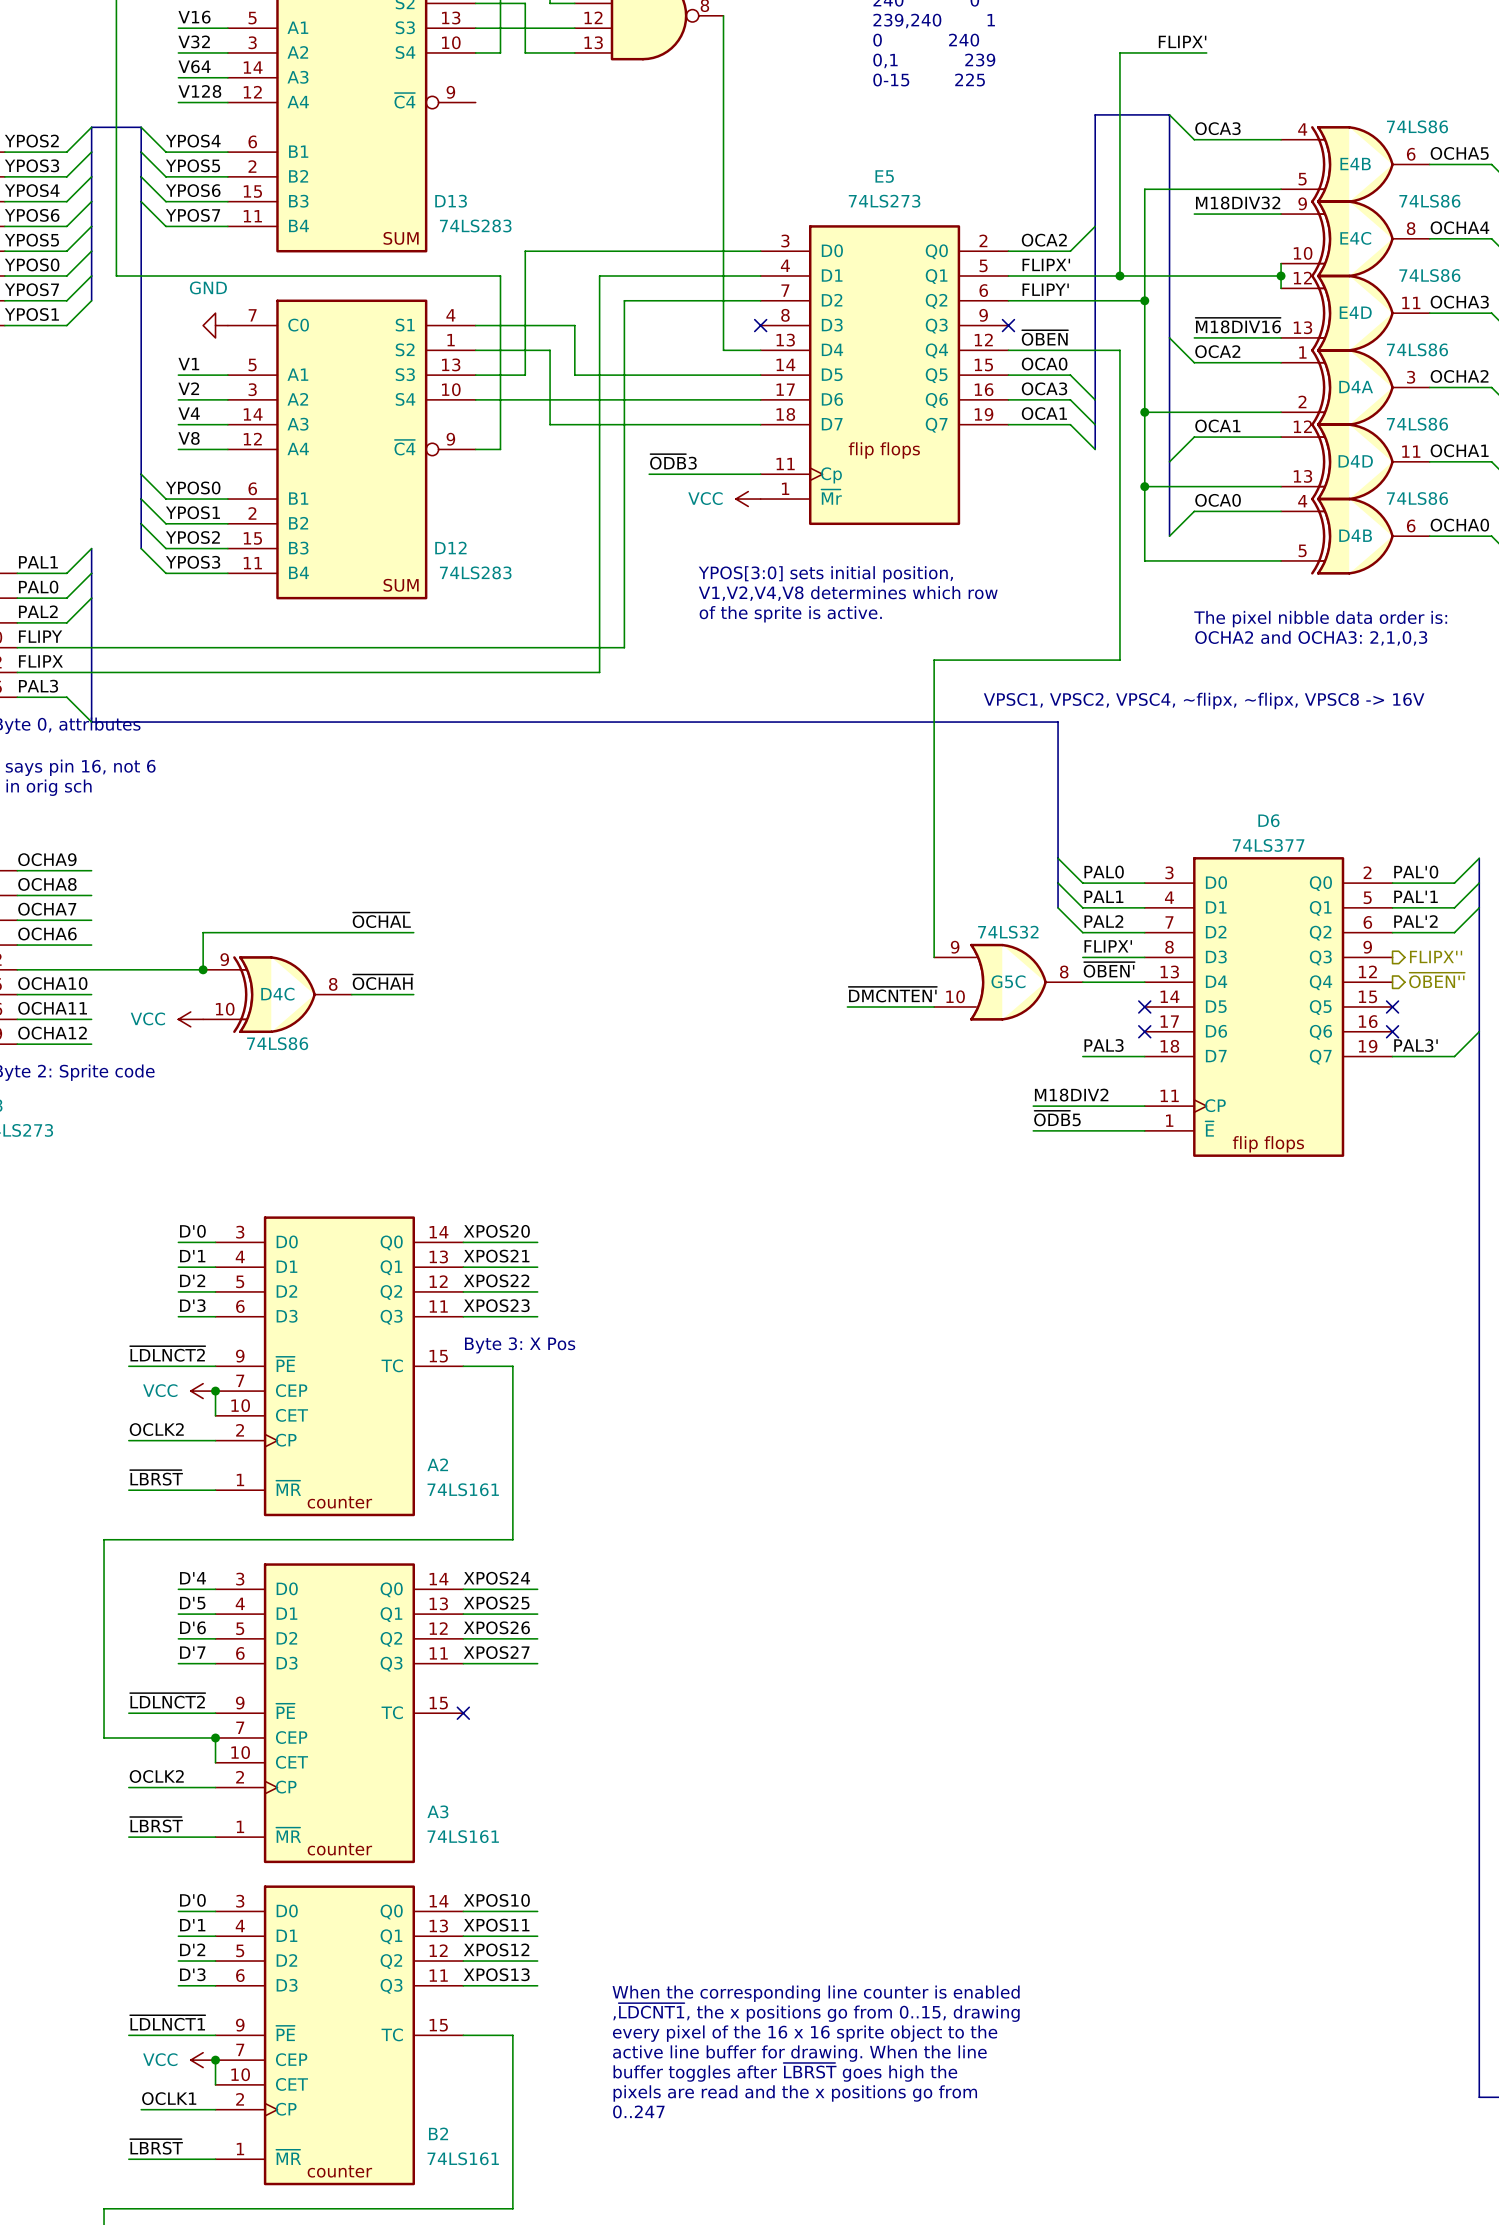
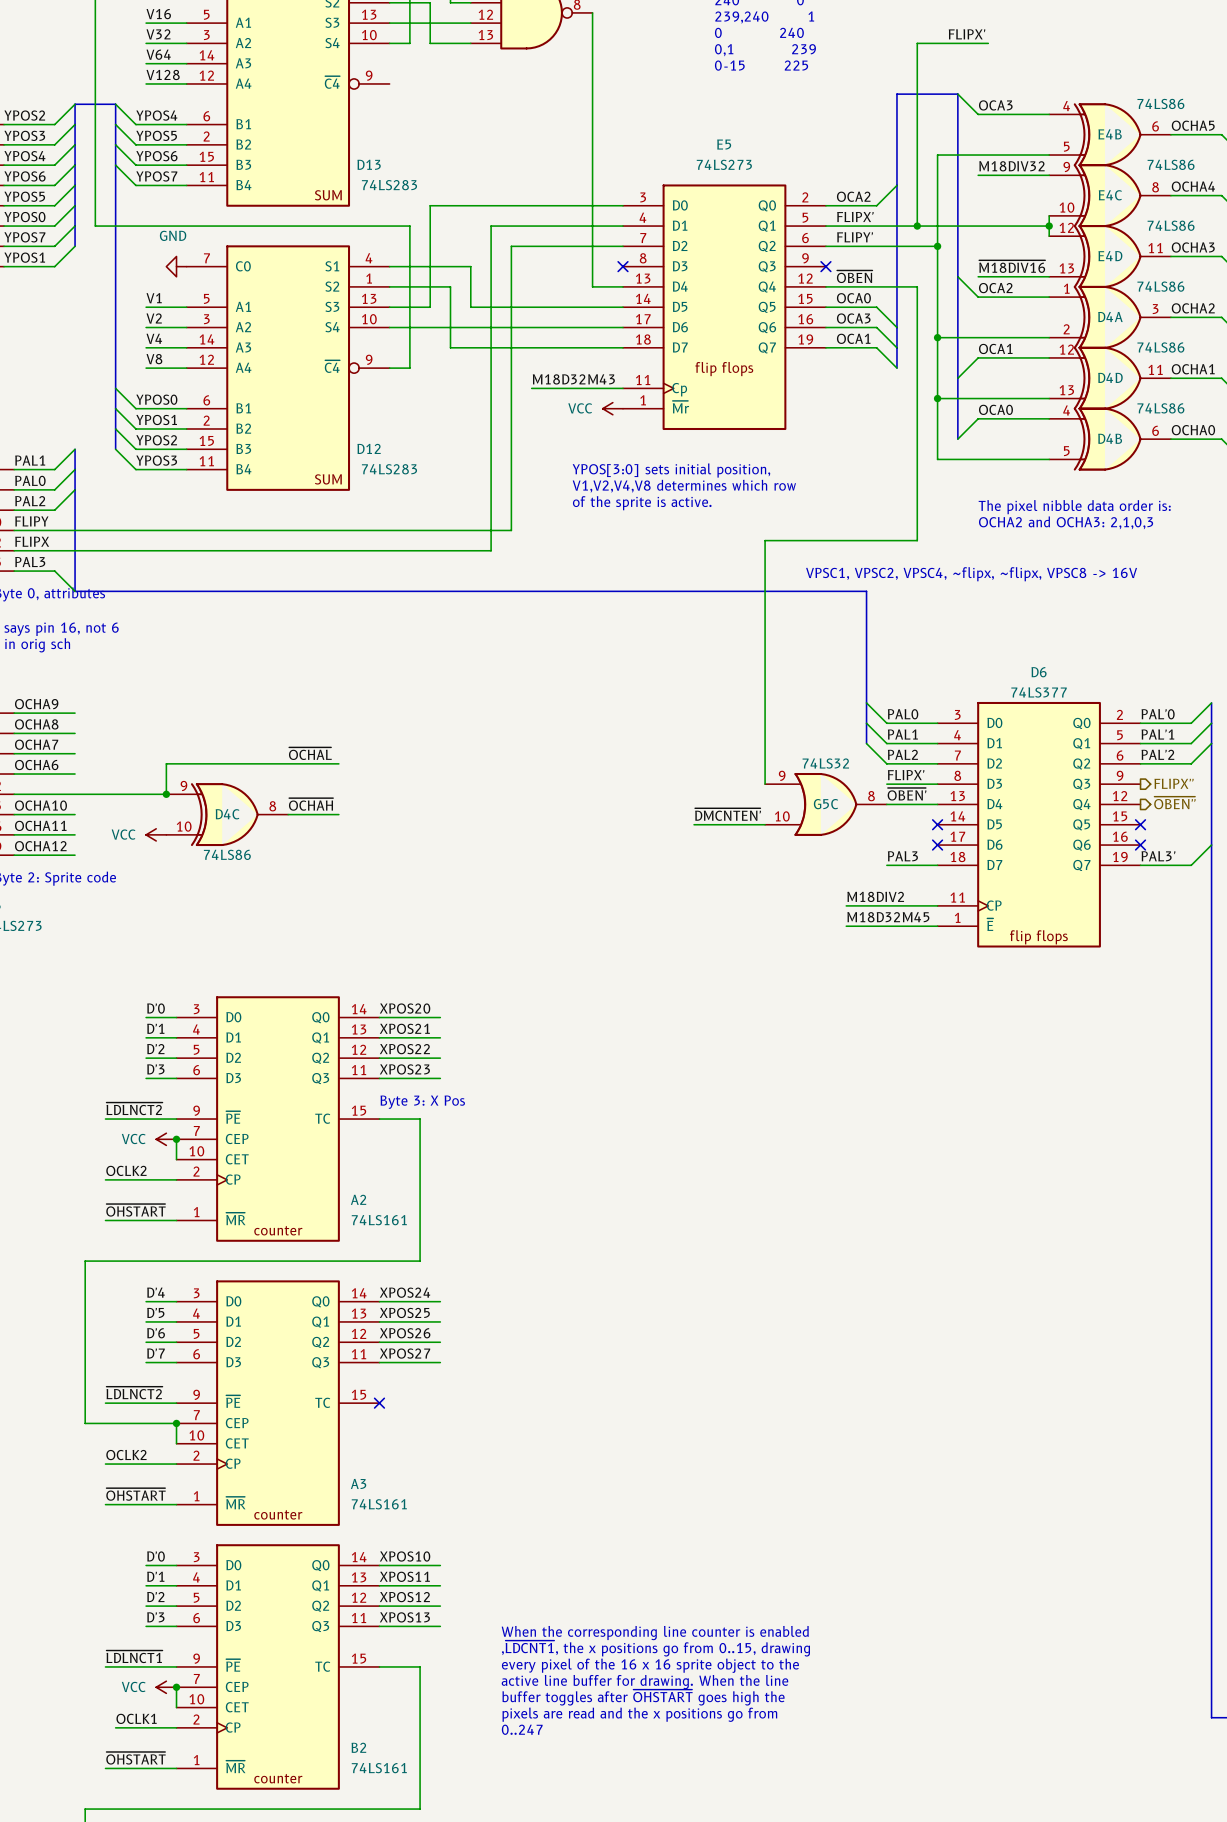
label: ~{ODB}3 (673, 461) -> M18D32M43 (573, 379)
label: ~{ODB}5 (1057, 1118) -> M18D32M45 (888, 917)
label: ~{LBRST} (156, 1477) -> ~{OHSTART} (135, 1210)
label: ~{LBRST} (156, 1824) -> ~{OHSTART} (135, 1494)
text: buffer toggles after ~{LBRST} goes high the (785, 2072) -> buffer toggles after ~{OHSTART} goes high the (643, 1697)
label: ~{LBRST} (156, 2146) -> ~{OHSTART} (135, 1758)

